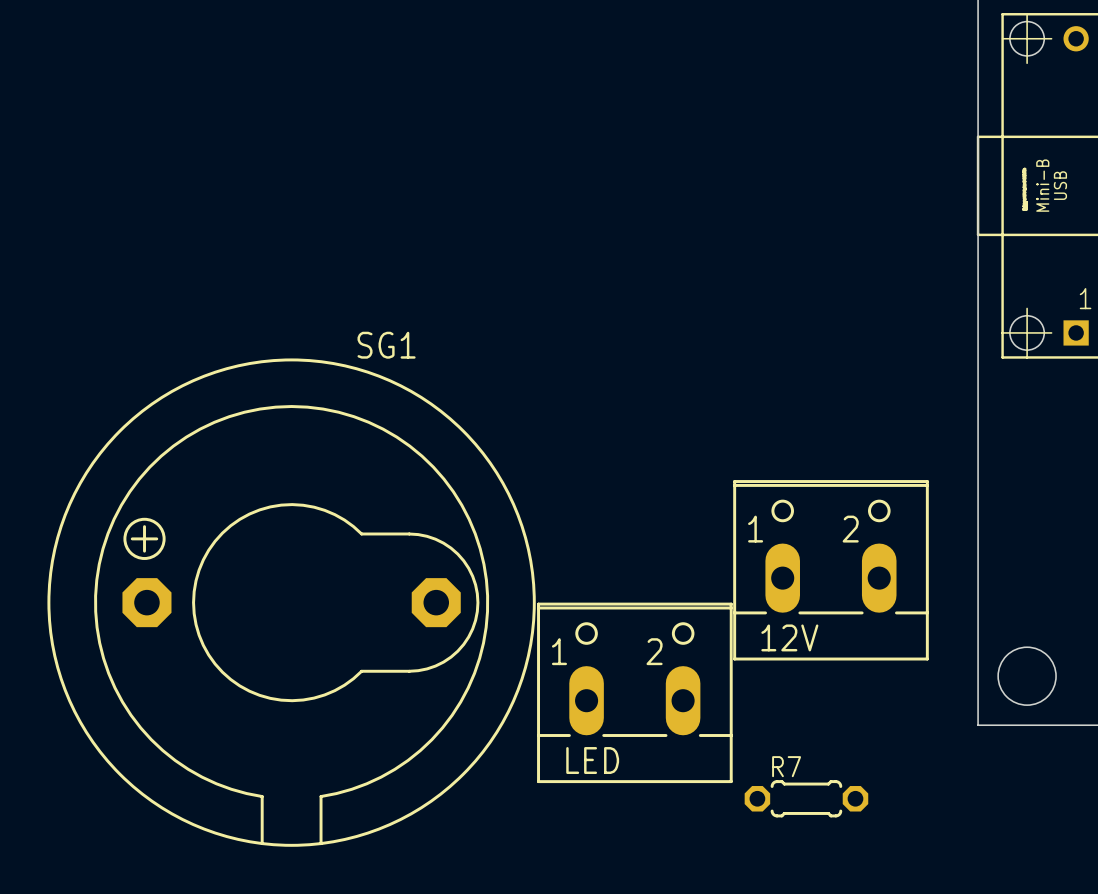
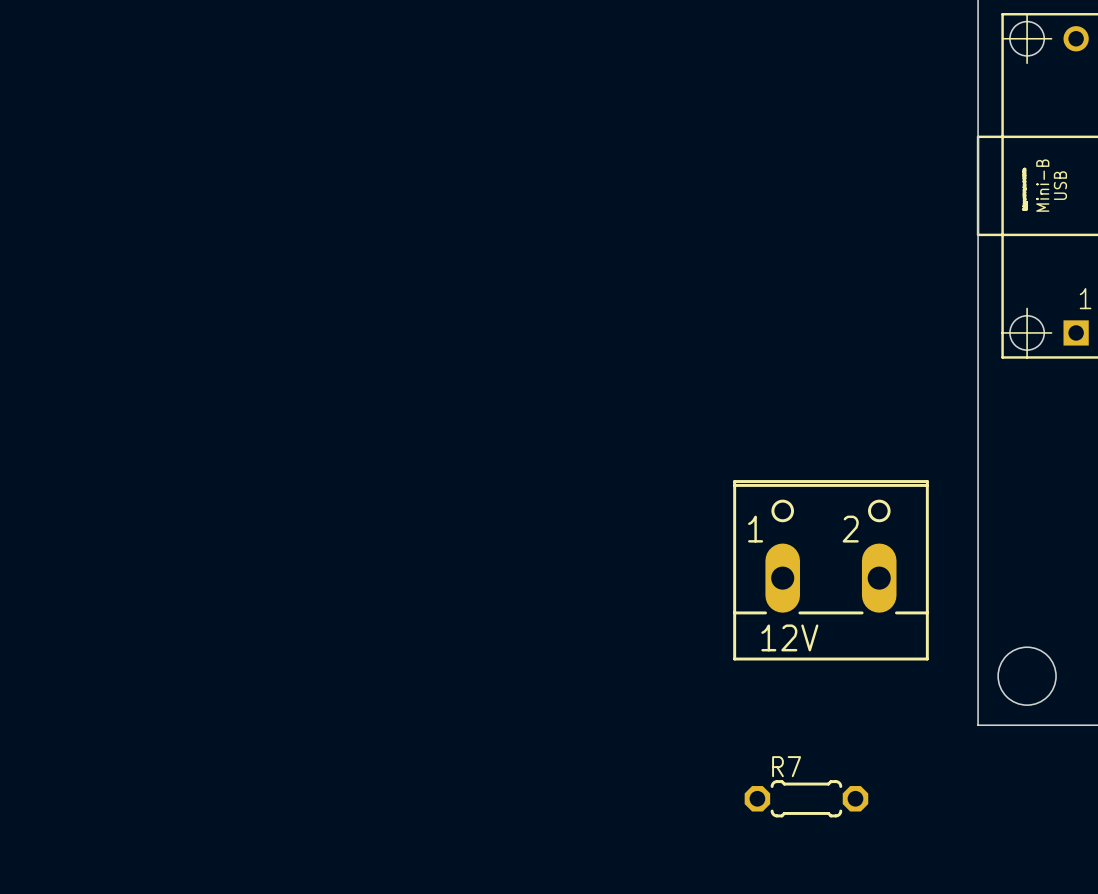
SG1: (291, 602) -> none
LED: (634, 692) -> none

